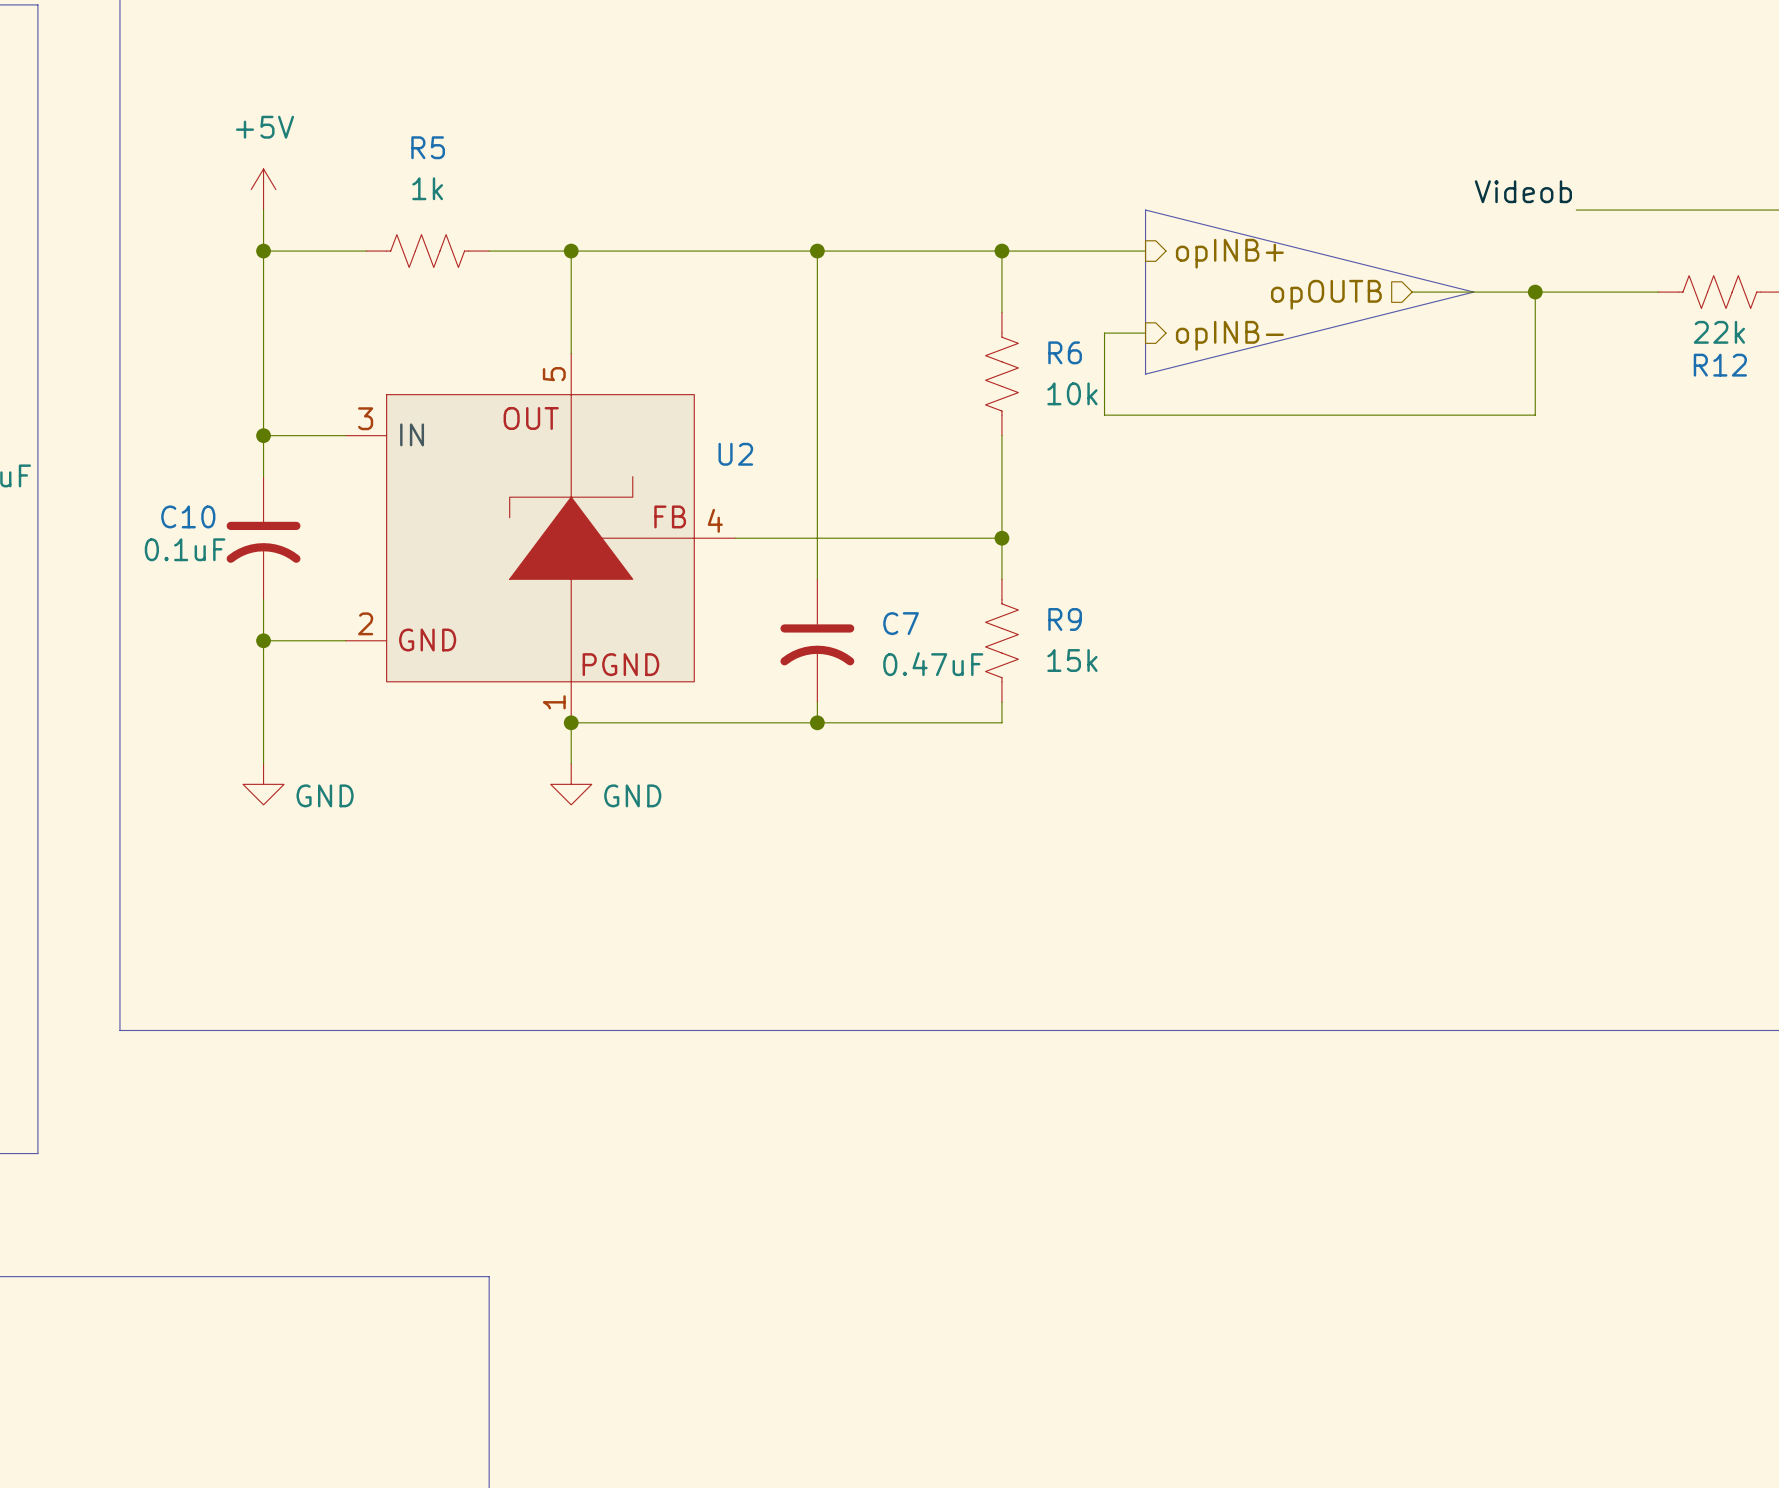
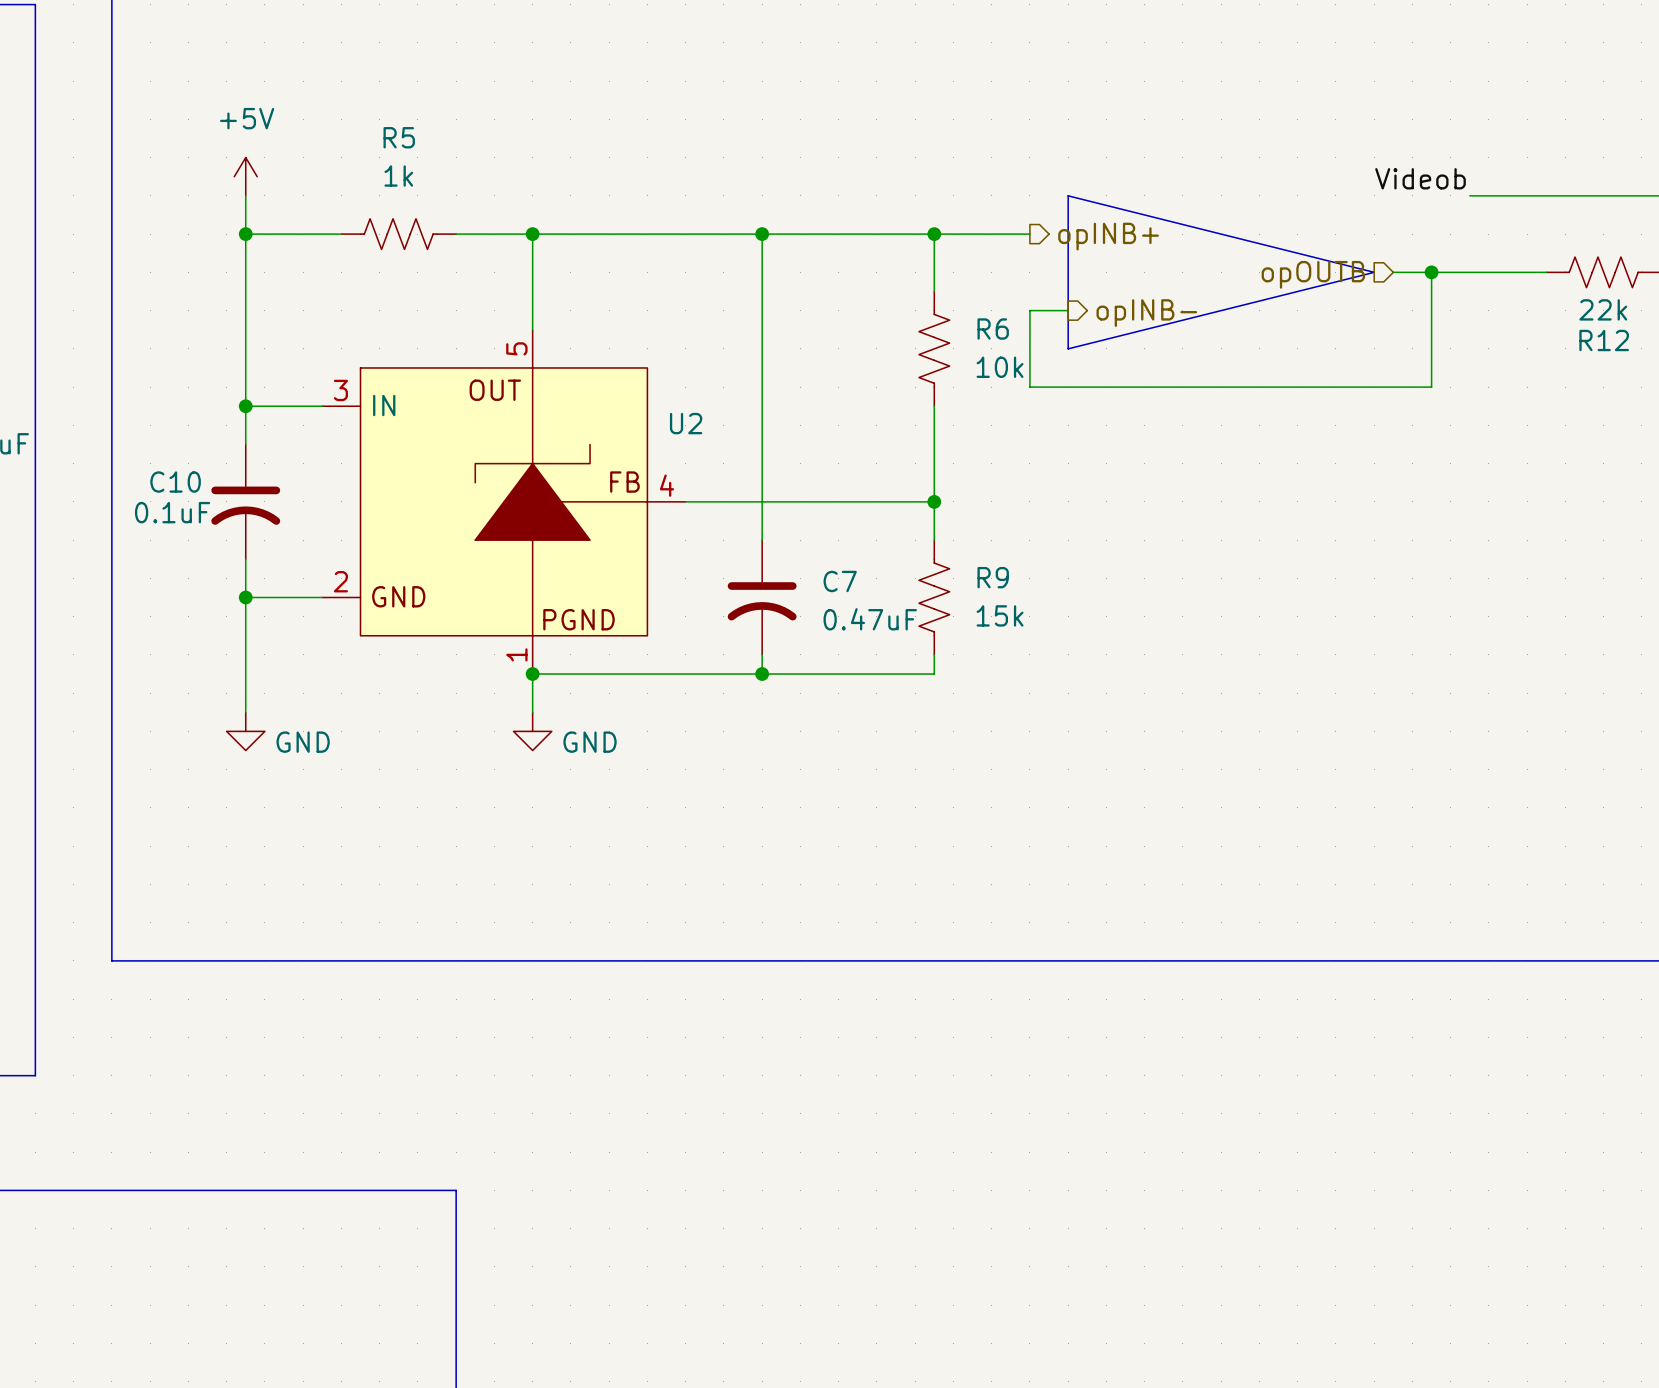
wire: (1104, 251) (1145, 251) -> none
hierarchical label position: opINB+ (1229, 253) -> opINB+ (1108, 236)
wire: (1412, 292) (1494, 292) -> none
hierarchical label position: opOUTB (1326, 294) -> opOUTB (1313, 274)

